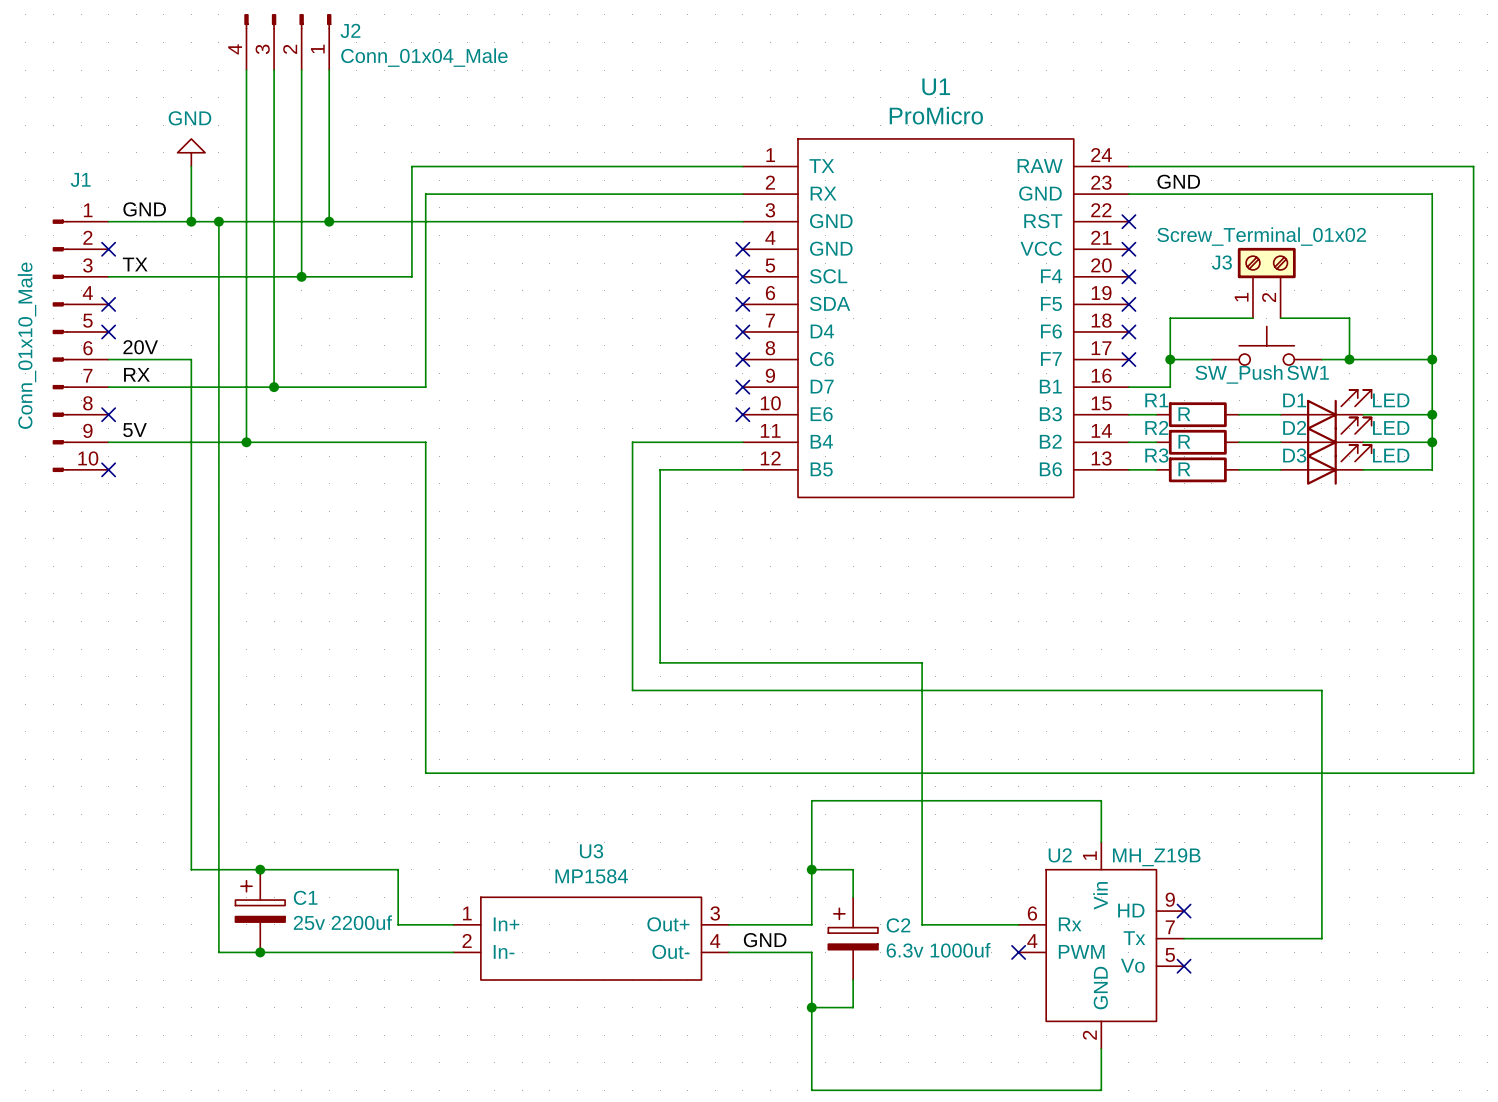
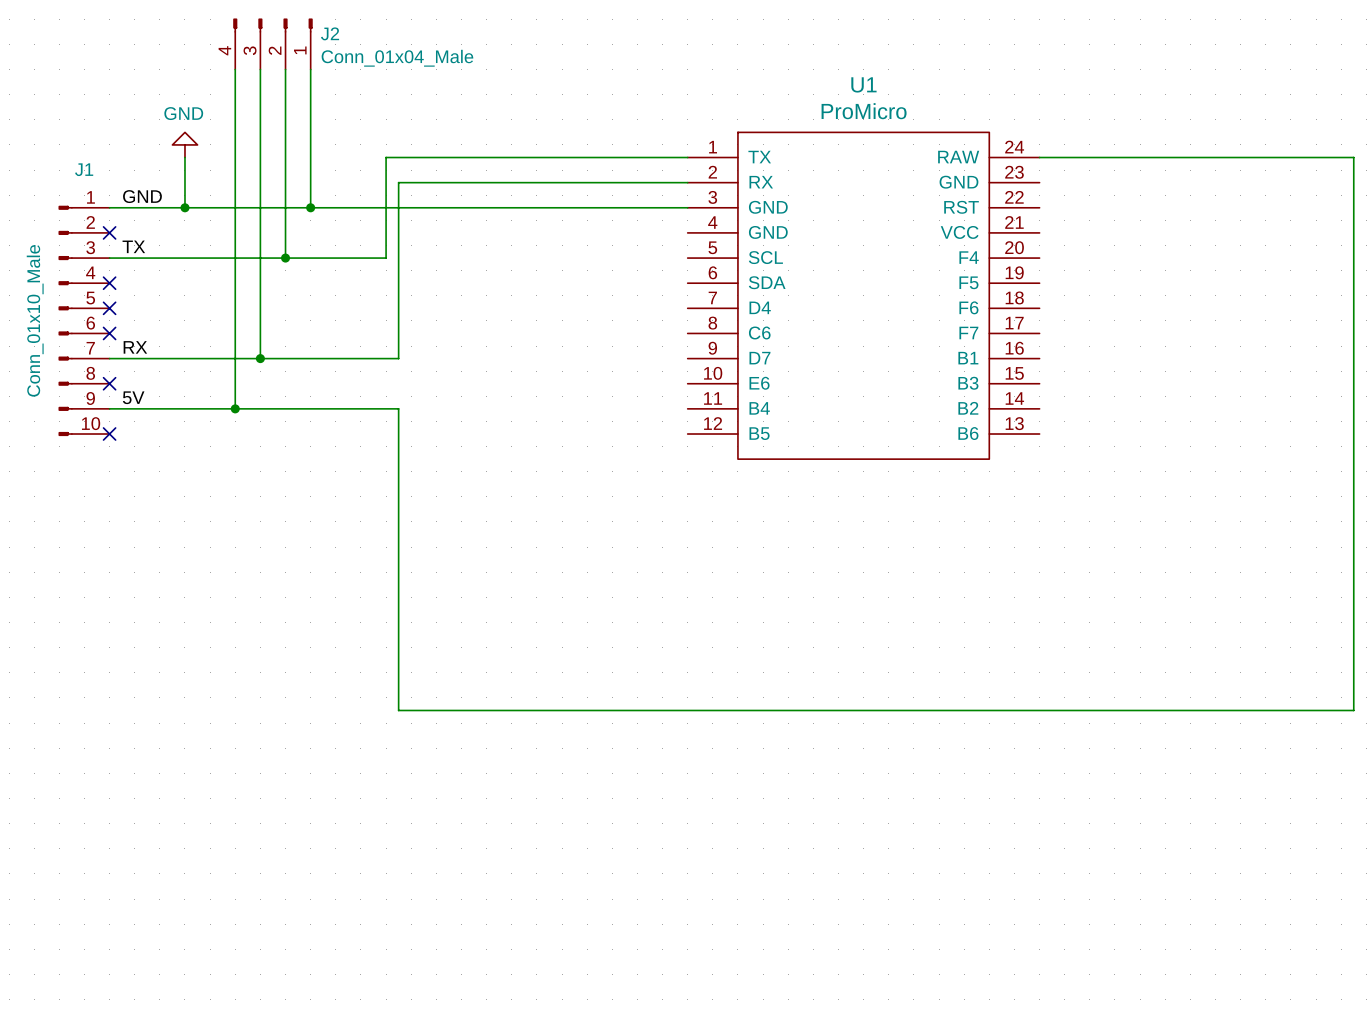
label: GND (1178, 181) -> none
wire: (1128, 194) (1432, 194) (1432, 469) (1363, 469) -> none
wire: (218, 221) (218, 952) (453, 952) -> none
junction: (218, 221) -> none
no-connect mark: (1128, 221) -> none
no-connect mark: (742, 249) -> none
no-connect mark: (1128, 249) -> none
no-connect mark: (742, 276) -> none
no-connect mark: (1128, 276) -> none
J3: Screw_Terminal_01x02 (1266, 283) -> none
no-connect mark: (742, 304) -> none
no-connect mark: (1128, 304) -> none
wire: (1252, 318) (1170, 318) (1170, 387) (1128, 387) -> none
wire: (1280, 318) (1349, 318) (1349, 359) -> none
no-connect mark: (742, 331) -> none
no-connect mark: (1128, 331) -> none
SW1: SW_Push (1266, 345) -> none
label: 20V (140, 347) -> none
wire: (108, 359) (191, 359) (191, 869) (398, 869) (398, 924) (453, 924) -> none
no-connect mark: none -> (109, 333)
no-connect mark: (742, 359) -> none
no-connect mark: (1128, 359) -> none
wire: (1170, 359) (1211, 359) -> none
junction: (1170, 359) -> none
wire: (1321, 359) (1432, 359) -> none
junction: (1349, 359) -> none
junction: (1432, 359) -> none
no-connect mark: (742, 387) -> none
D1: LED (1326, 409) -> none
no-connect mark: (742, 414) -> none
wire: (1128, 414) (1156, 414) -> none
R1: R (1197, 414) -> none
wire: (1239, 414) (1280, 414) -> none
wire: (1363, 414) (1432, 414) -> none
junction: (1432, 414) -> none
D2: LED (1326, 437) -> none
wire: (742, 442) (632, 442) (632, 690) (1321, 690) (1321, 938) (1184, 938) -> none
wire: (1128, 442) (1156, 442) -> none
R2: R (1197, 442) -> none
wire: (1239, 442) (1280, 442) -> none
wire: (1363, 442) (1432, 442) -> none
junction: (1432, 442) -> none
D3: LED (1326, 464) -> none
wire: (742, 469) (660, 469) (660, 662) (922, 662) (922, 924) (1018, 924) -> none
wire: (1128, 469) (1156, 469) -> none
R3: R (1197, 469) -> none
wire: (1239, 469) (1280, 469) -> none
wire: (1101, 842) (1101, 800) (811, 800) (811, 924) (729, 924) -> none
junction: (260, 869) -> none
wire: (811, 869) (853, 869) (853, 897) -> none
junction: (811, 869) -> none
C1: 25v 2200uf (260, 911) -> none
no-connect mark: (1184, 911) -> none
U3: MP1584 (591, 938) -> none
C2: 6.3v 1000uf (853, 938) -> none
label: GND (765, 940) -> none
U2: MH_Z19B (1101, 945) -> none
junction: (260, 952) -> none
wire: (729, 952) (811, 952) (811, 1090) (1101, 1090) (1101, 1048) -> none
no-connect mark: (1018, 952) -> none
no-connect mark: (1184, 966) -> none
wire: (853, 980) (853, 1007) (811, 1007) -> none
junction: (811, 1007) -> none

